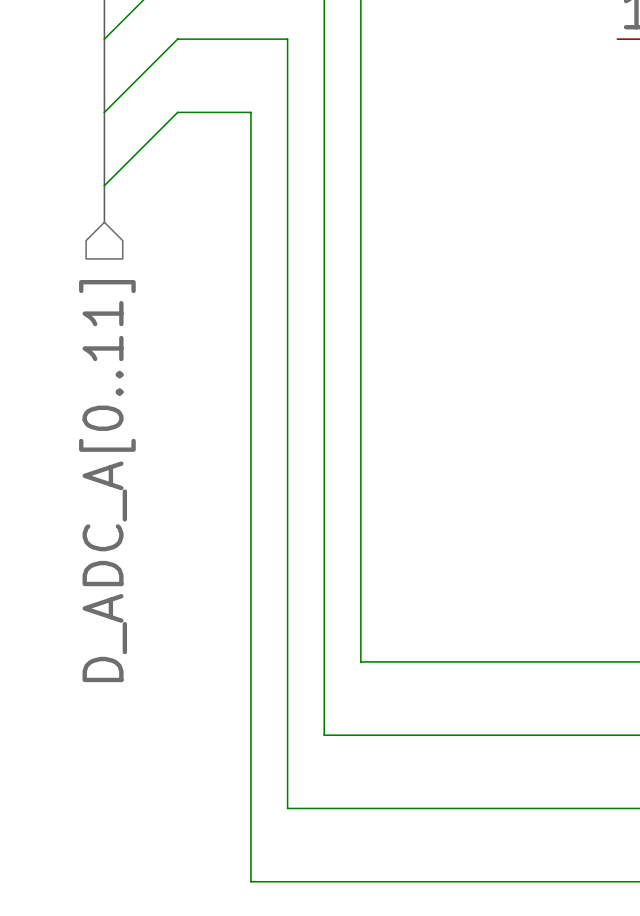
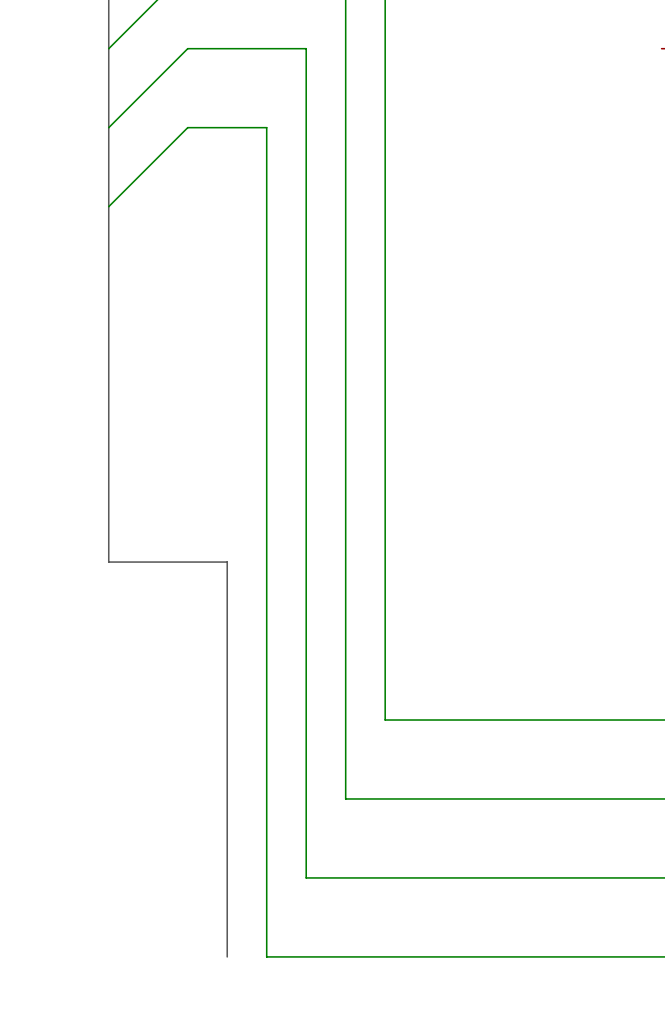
bus: none -> (108, 246) (108, 562) (227, 562) (227, 956)
hierarchical label: D_ADC_A[0..11] (107, 481) -> none

